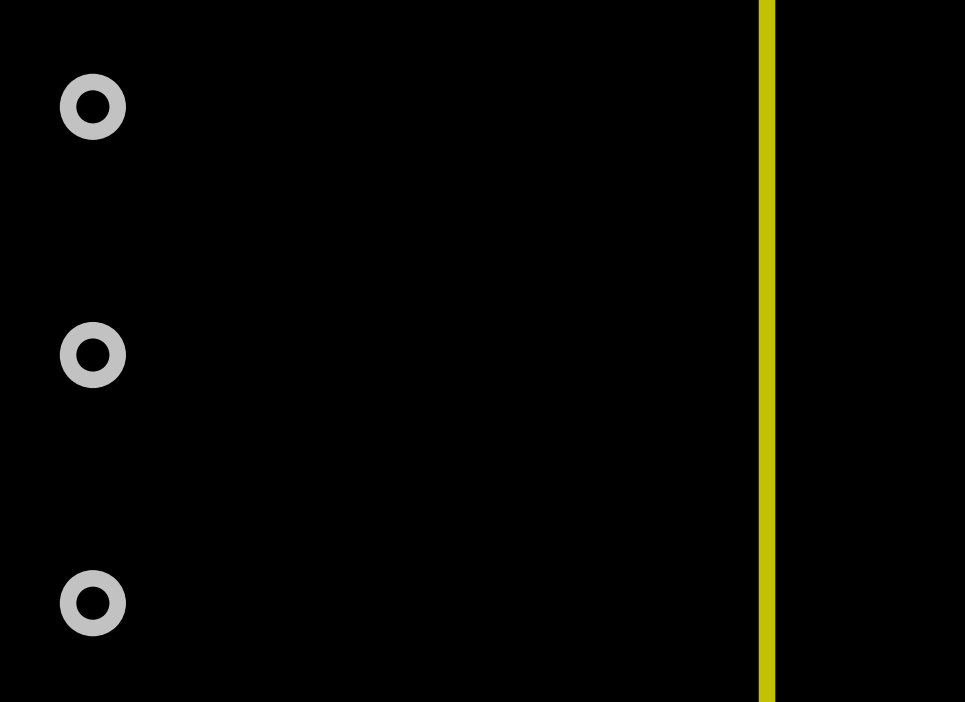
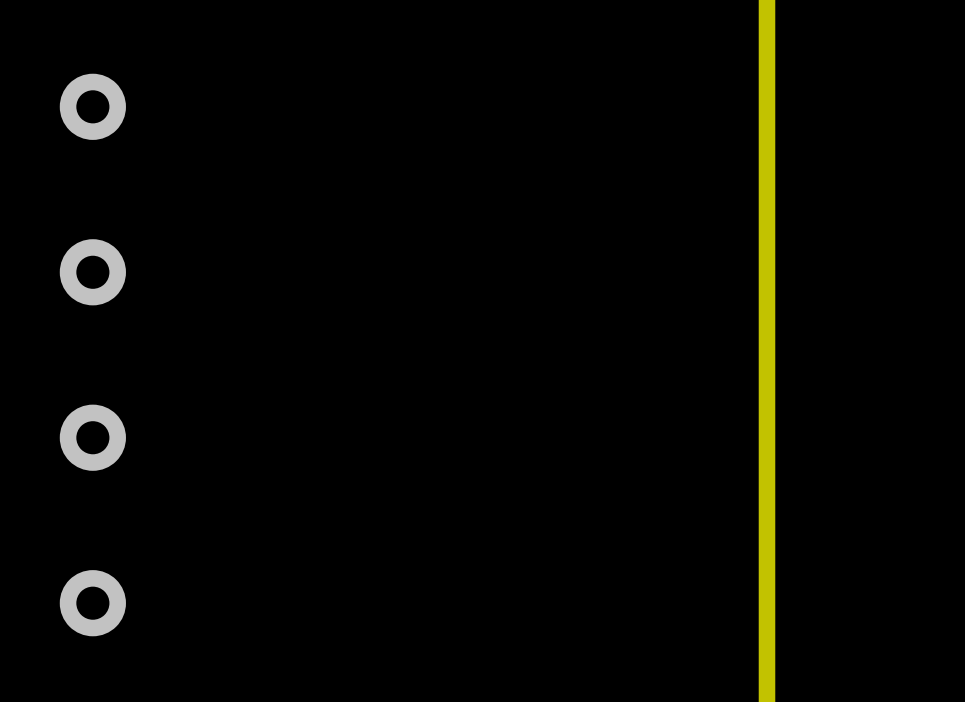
via: none -> (92, 272)
via: (92, 355) -> none
via: none -> (92, 437)

